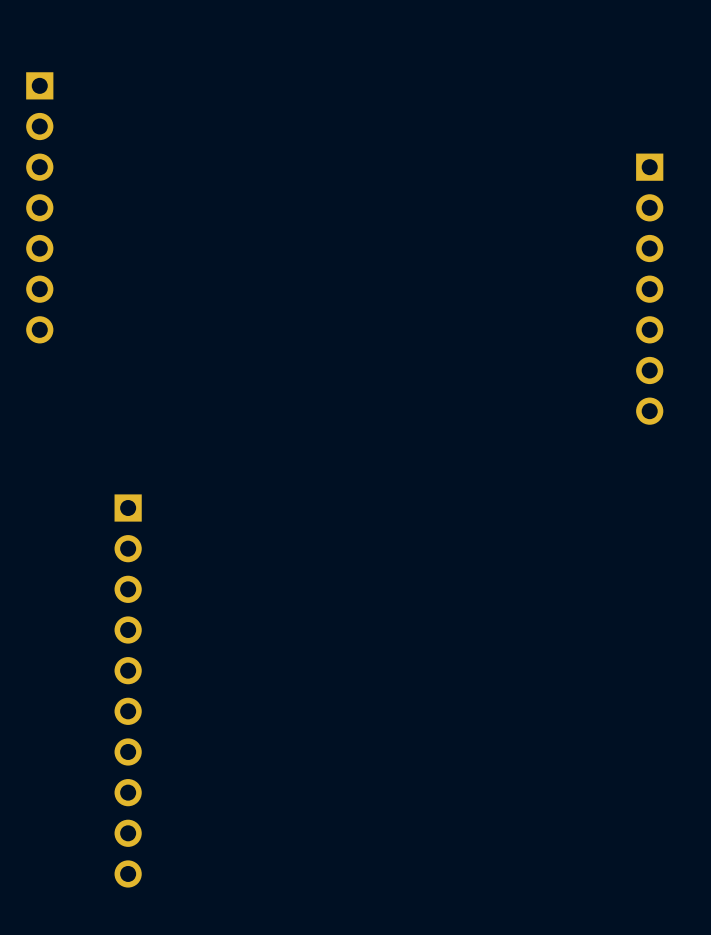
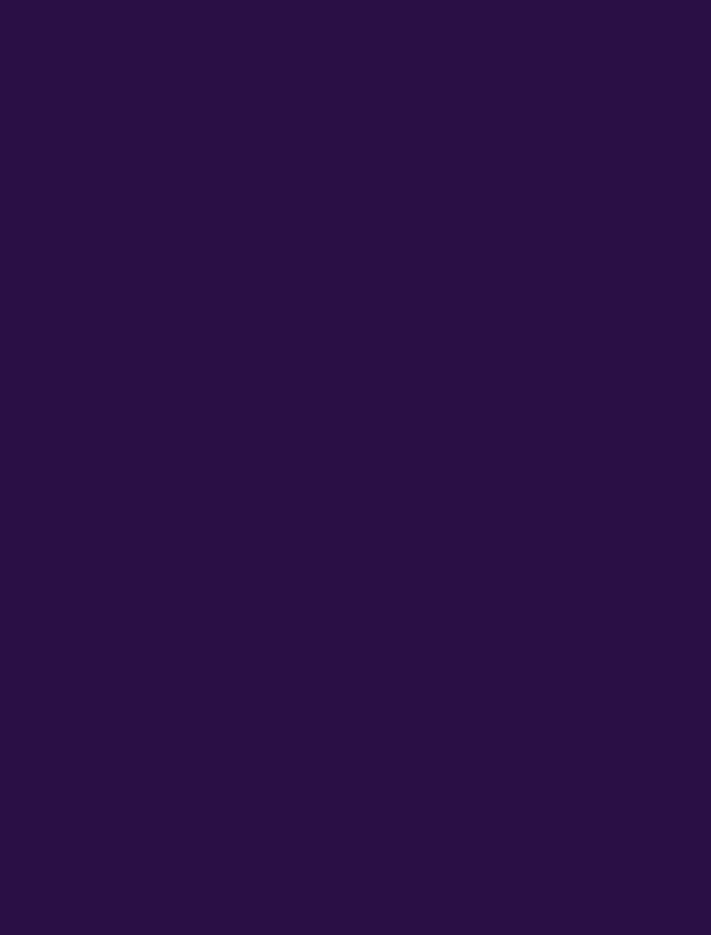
part: (39, 207) -> none
part: (649, 289) -> none
part: (128, 690) -> none

